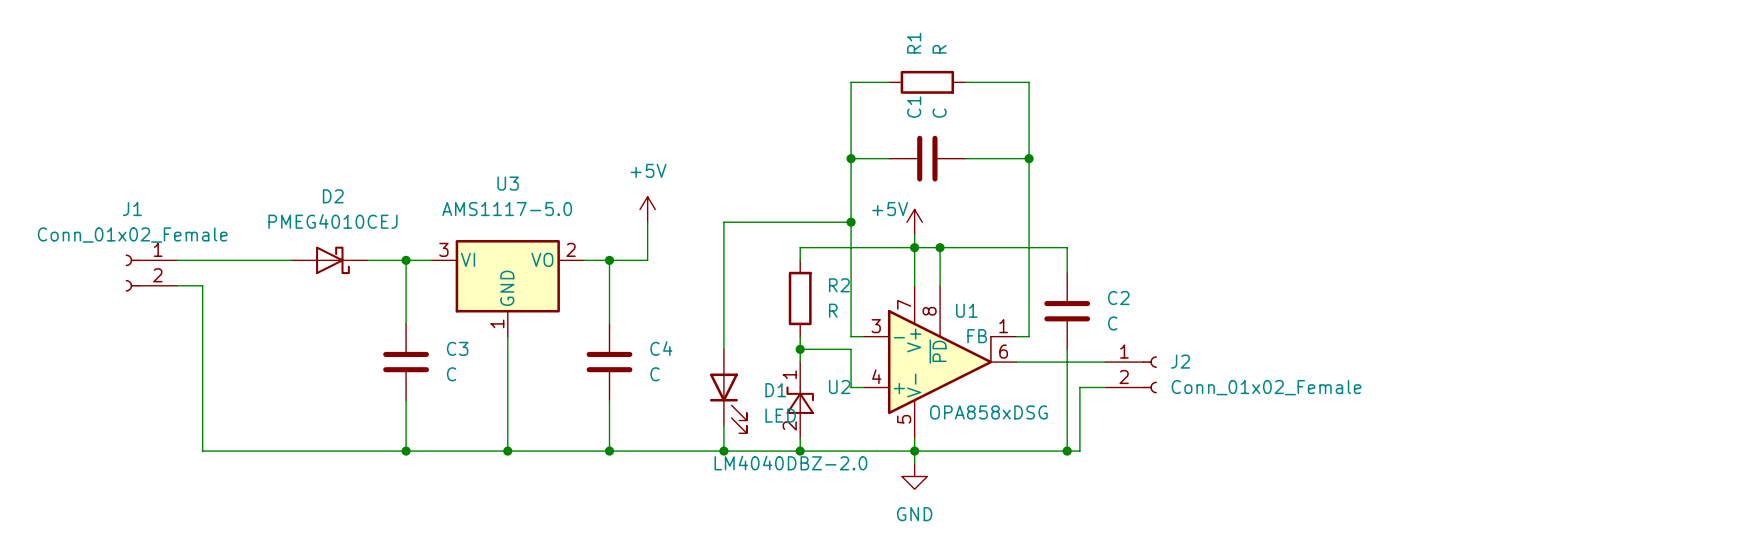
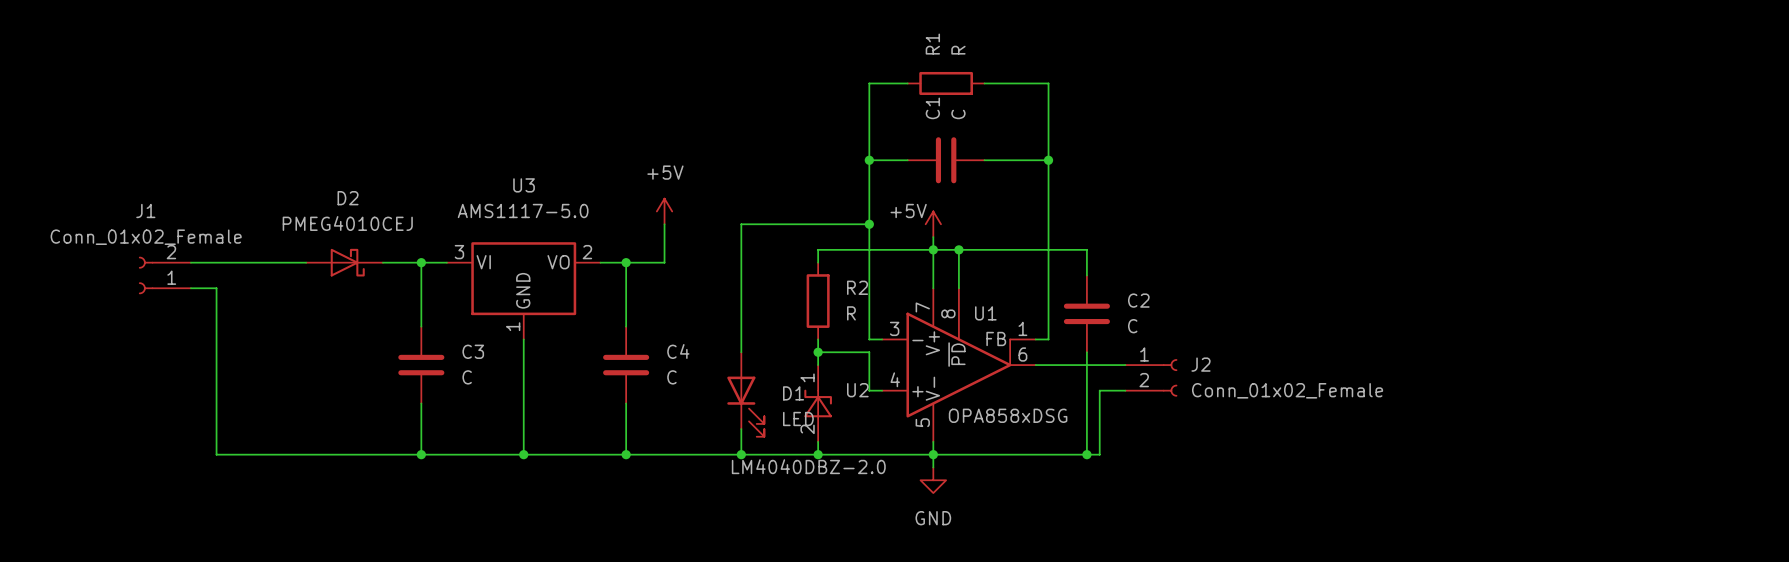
J1 flip: as is (132, 273) -> up-down (146, 275)

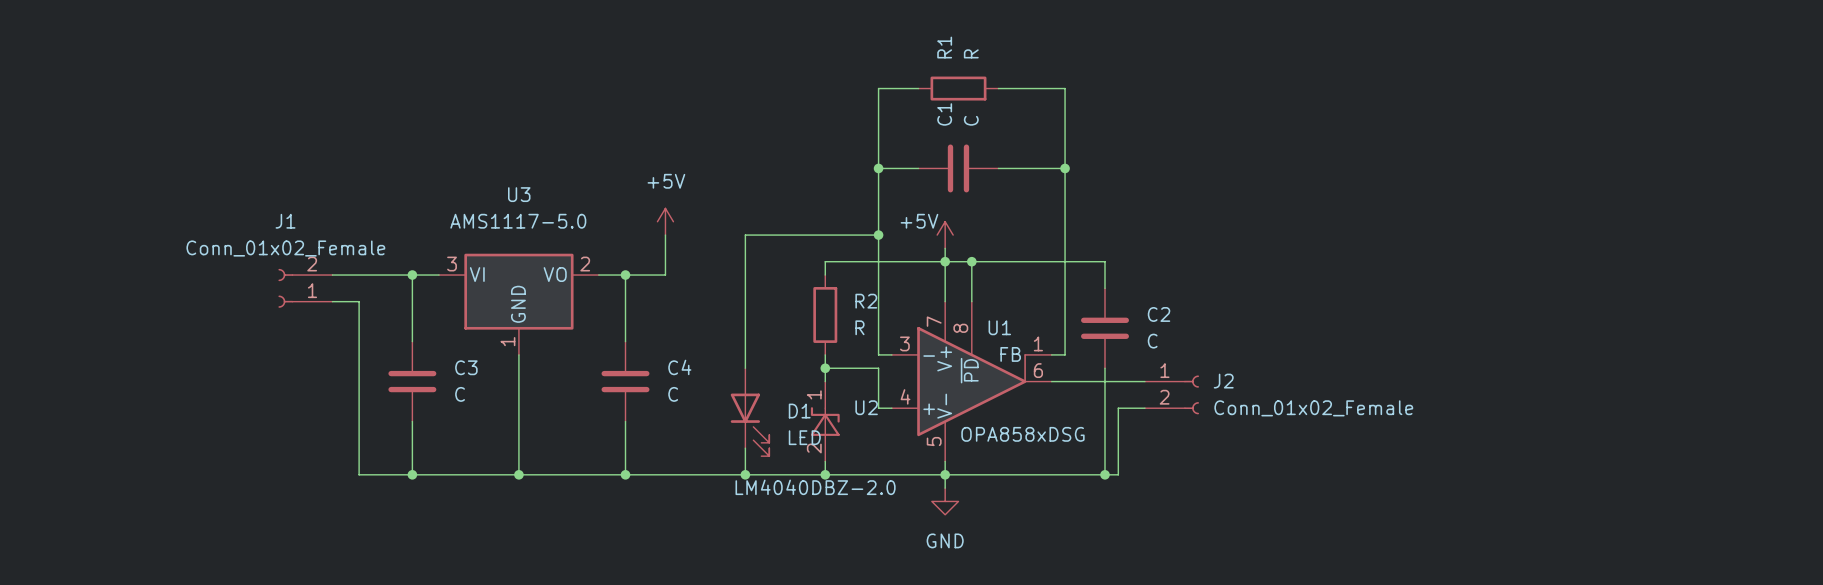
wire: (190, 262) (306, 262) -> none
D2: PMEG4010CEJ (344, 262) -> none
J1 position: (164, 275) -> (305, 288)
wire: (190, 288) (216, 288) (216, 454) (370, 454) -> (332, 301) (359, 301) (359, 474)

